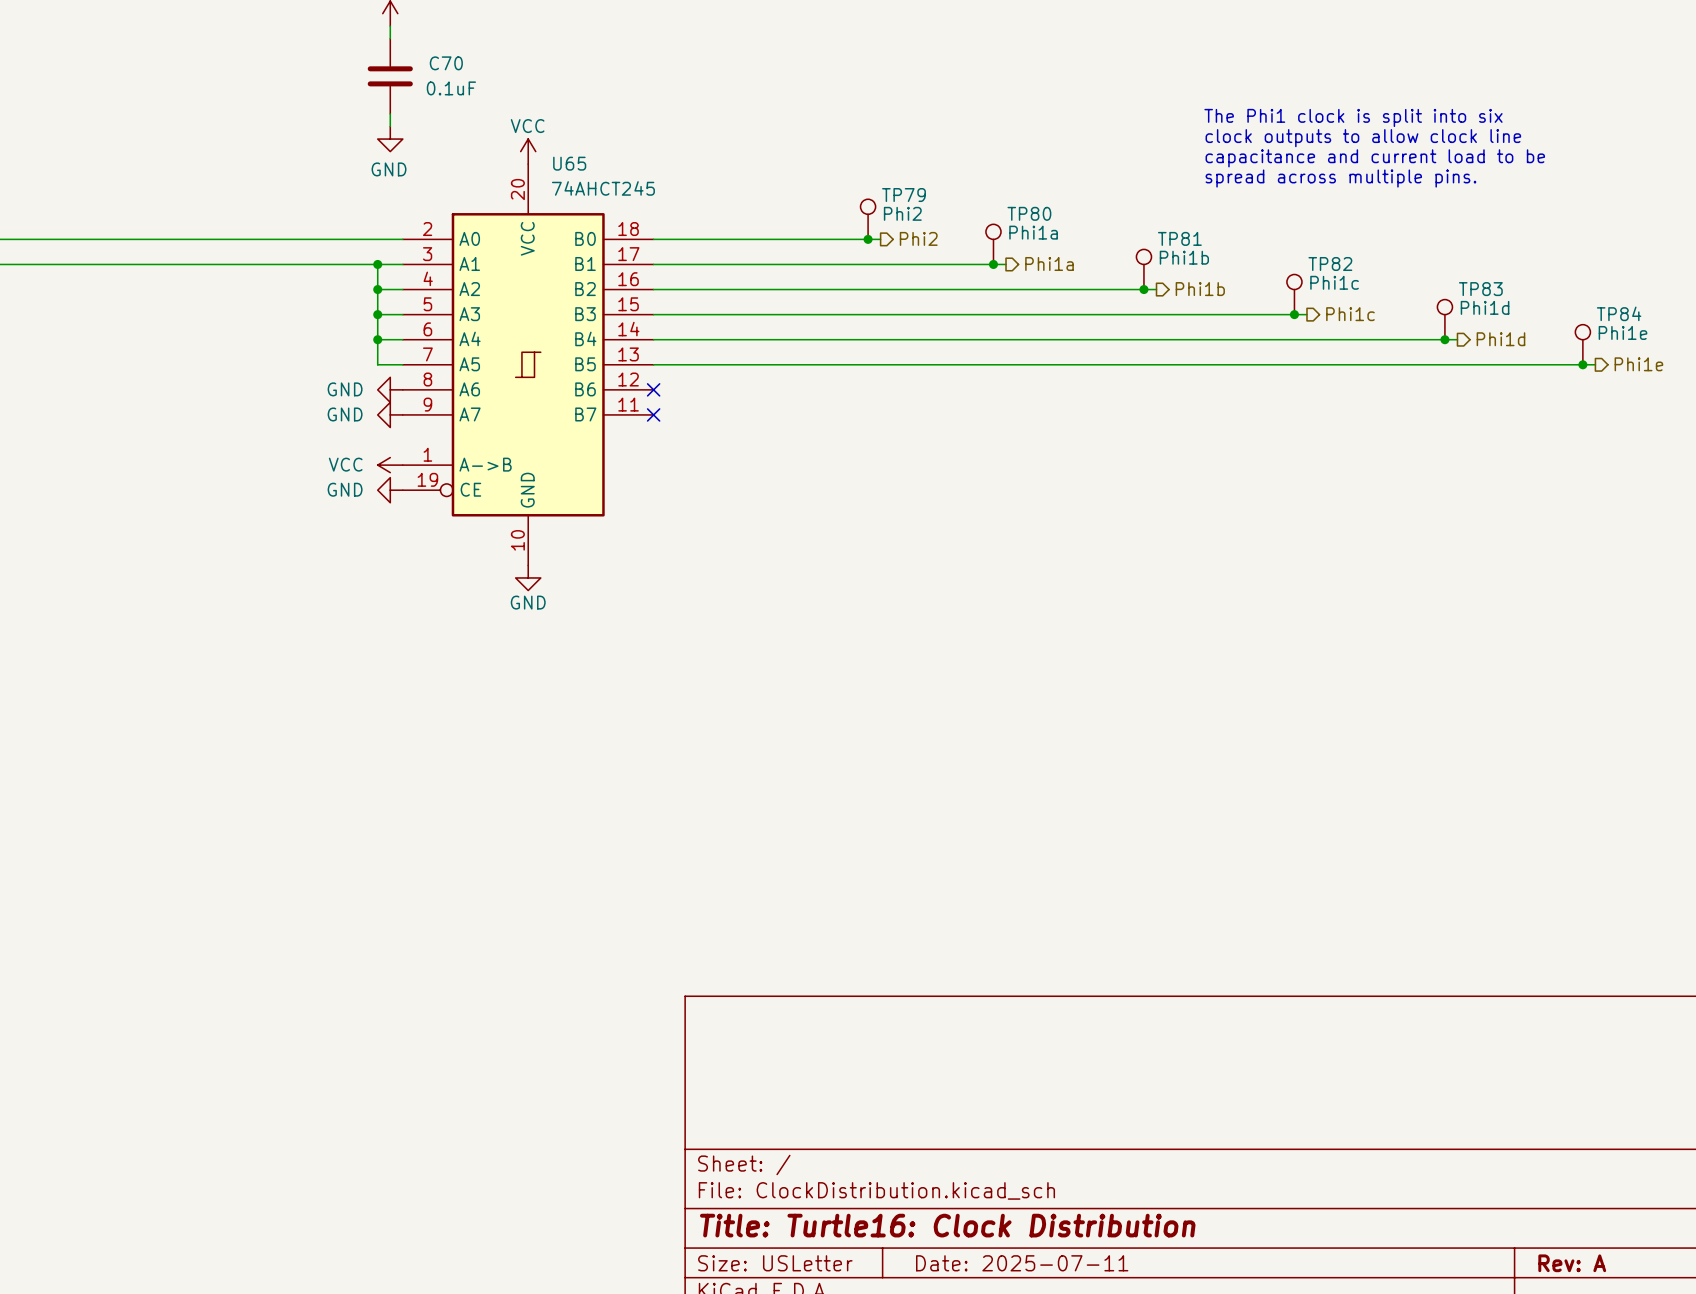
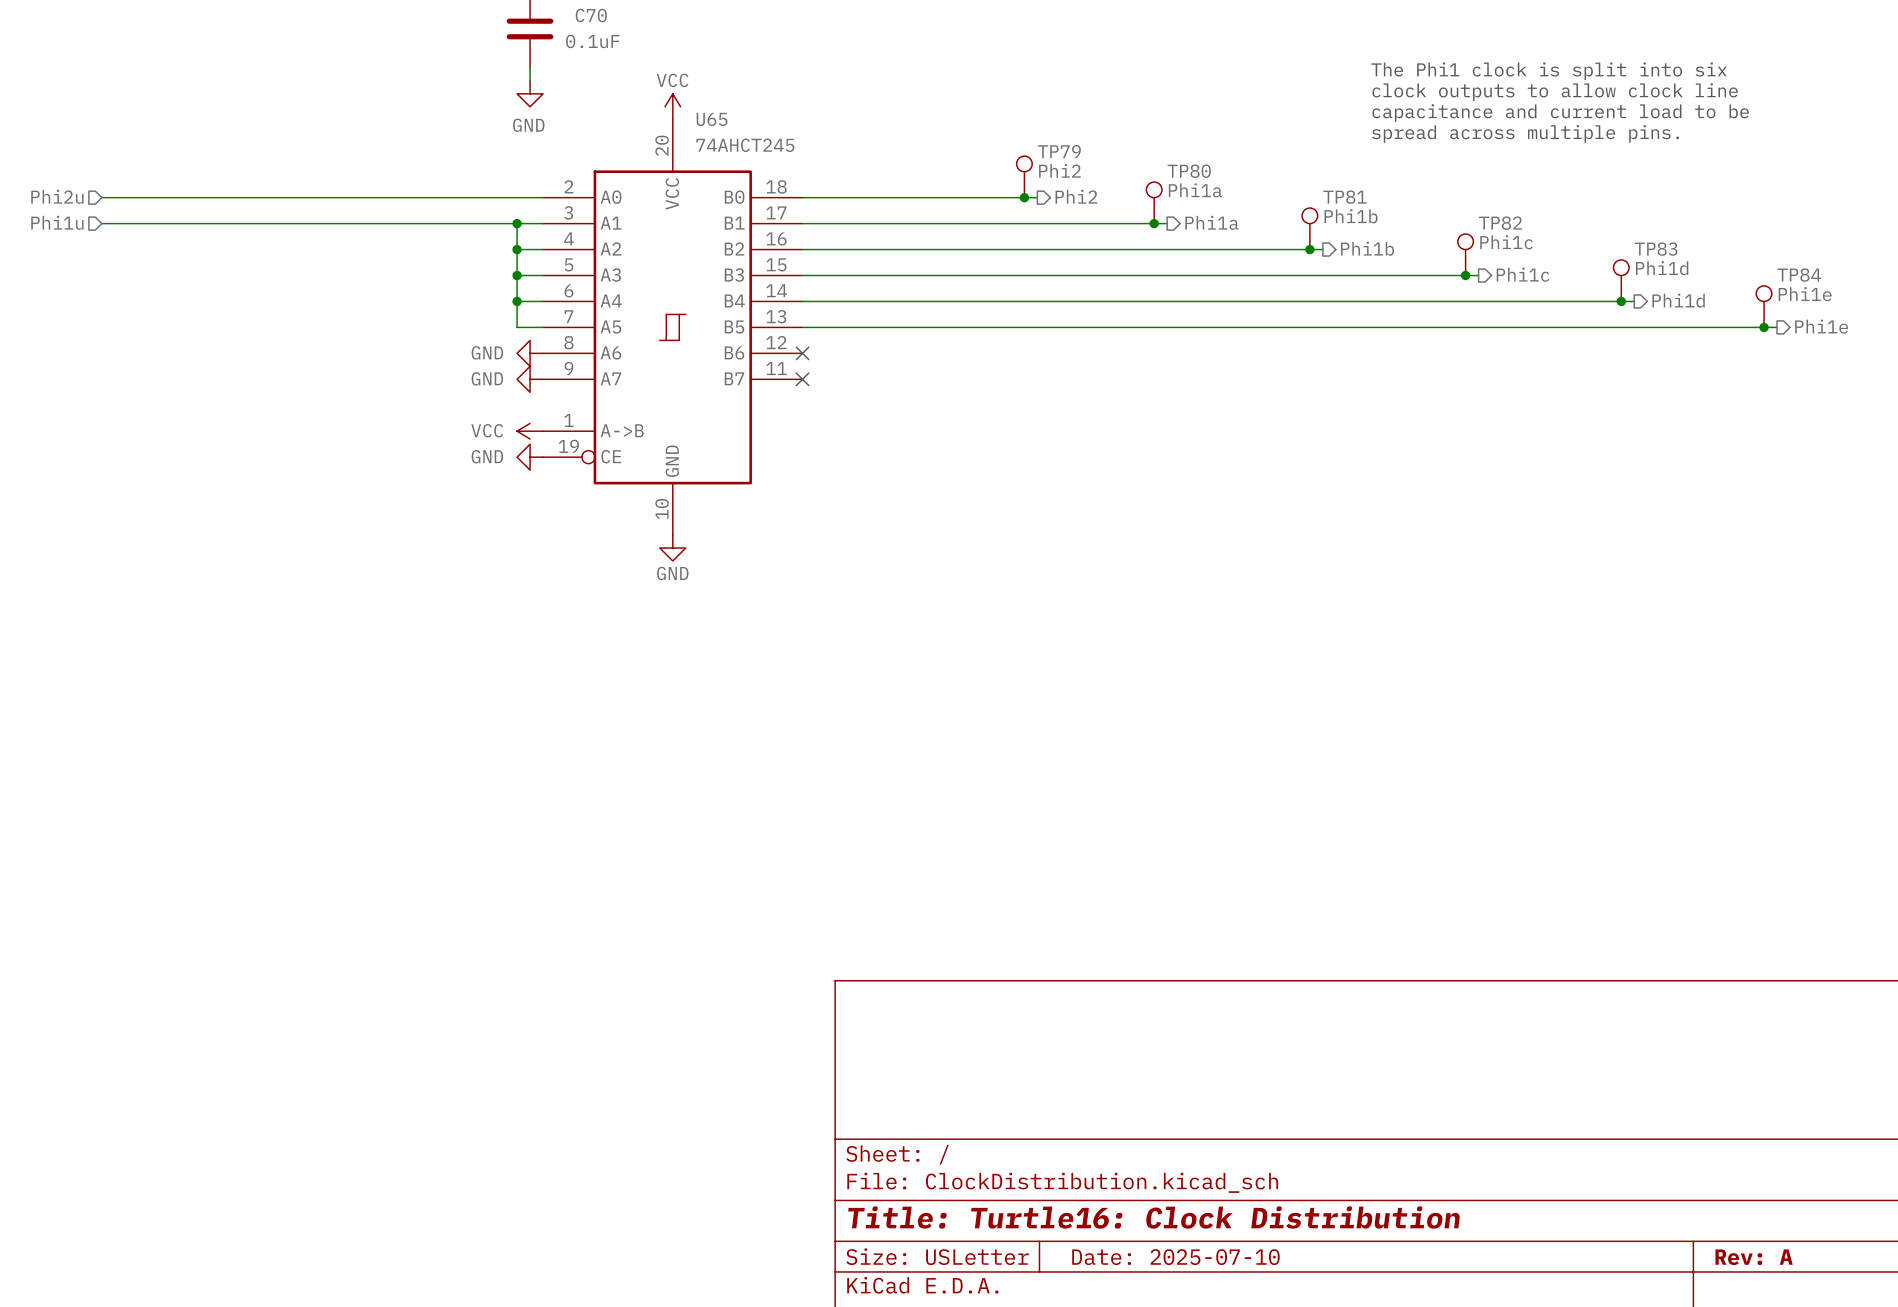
title block: Date: 2025-07-11 (1022, 1263) -> Date: 2025-07-10 (1175, 1257)

